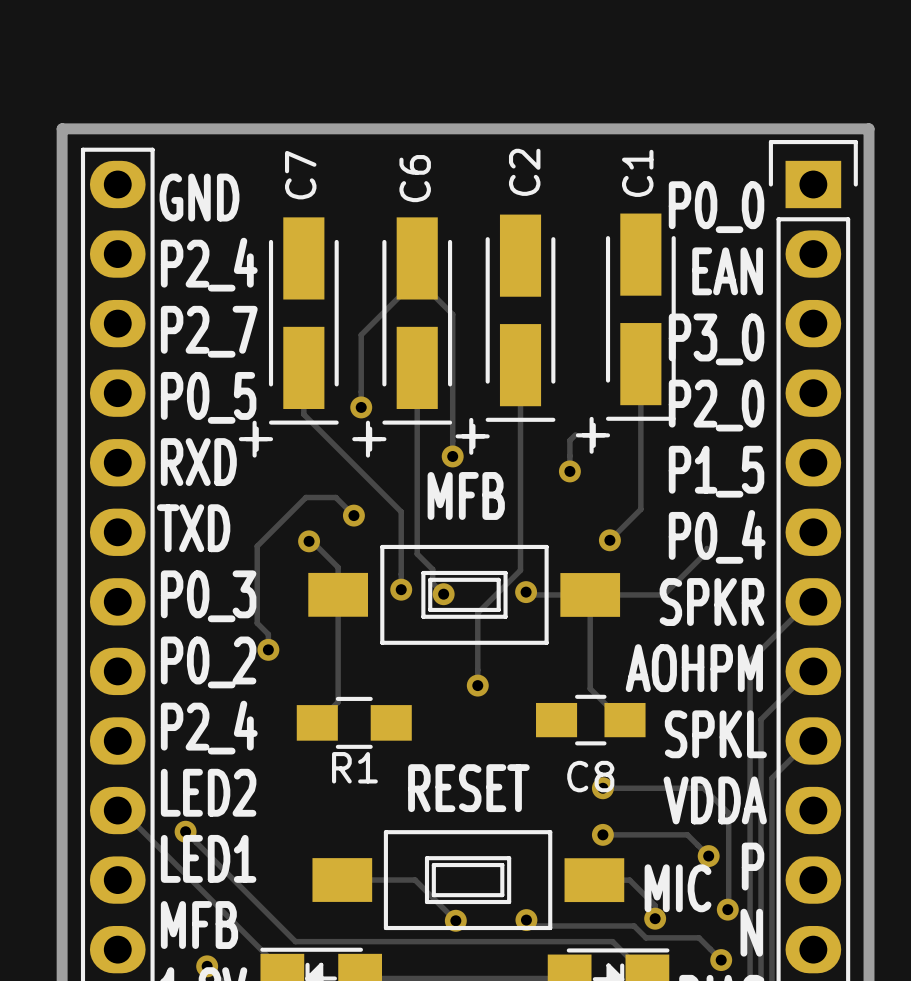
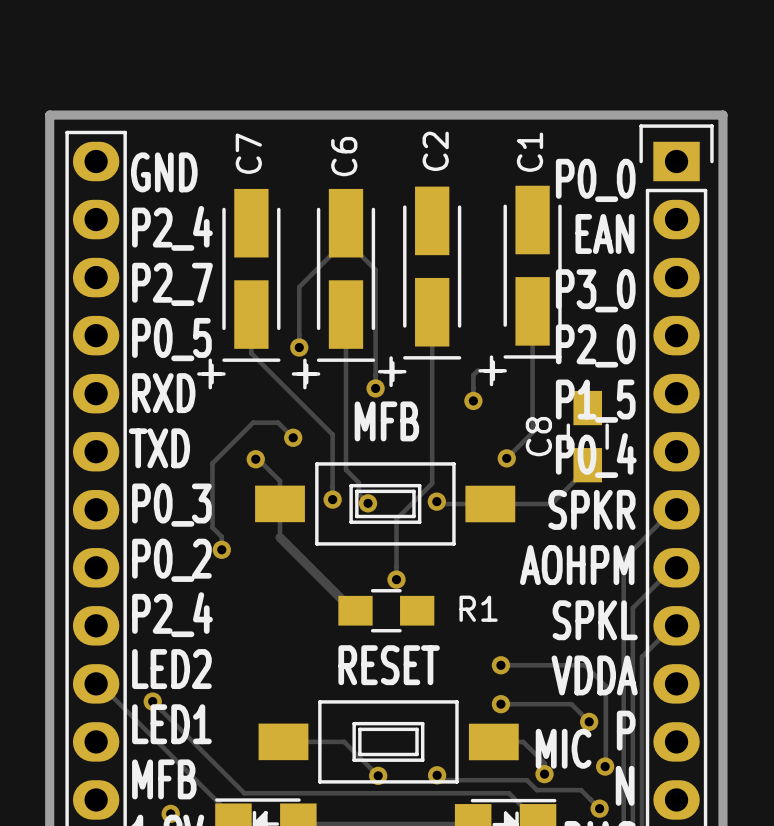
track: (590, 594) (590, 688) (621, 720) (625, 720) -> none
track: (338, 635) (338, 702) (317, 722) -> (280, 537) (353, 610) (355, 610)
C8 rotation: 0° (590, 720) -> 90° clockwise (587, 436)
C8 position: (590, 720) -> (587, 436)
R1 position: (354, 722) -> (386, 610)
R1 name position: R1 (354, 767) -> R1 (478, 608)

